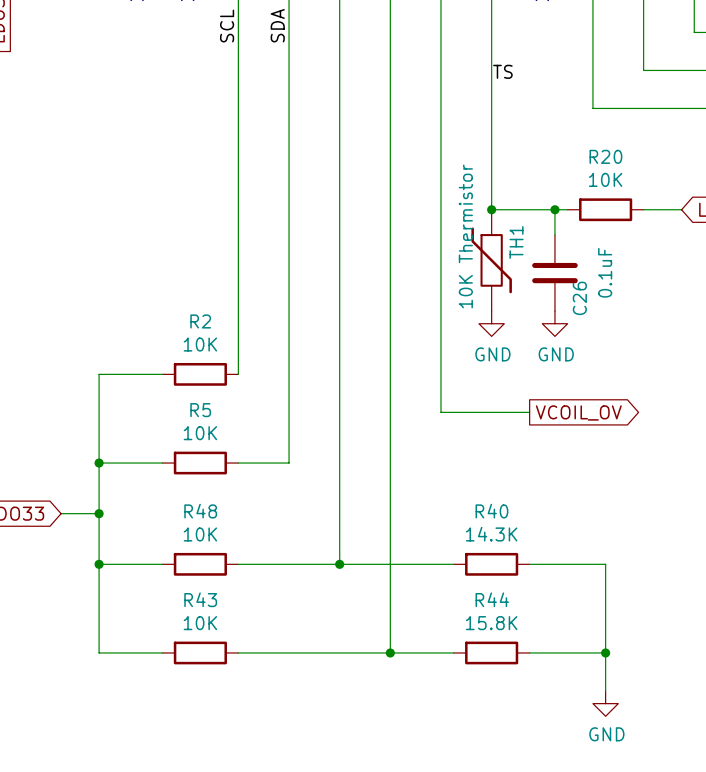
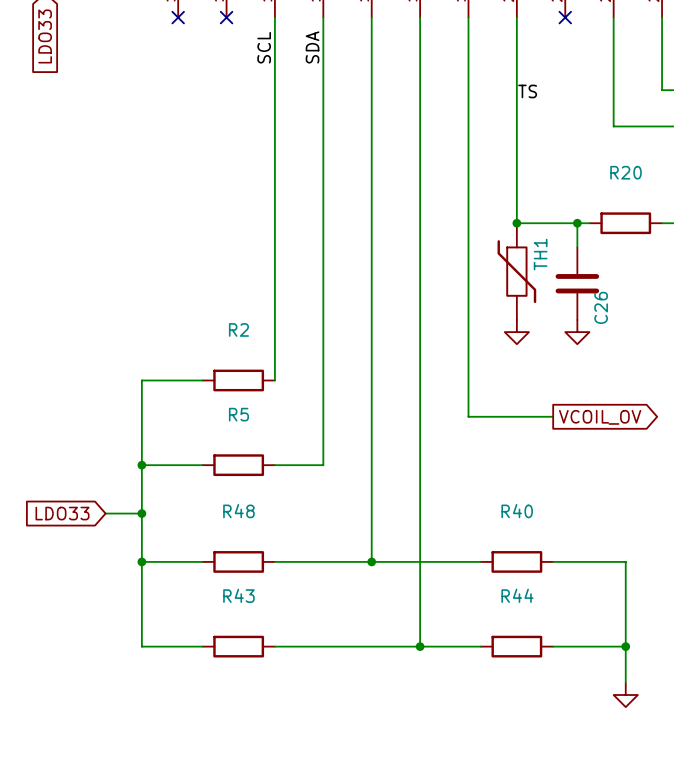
R20 value: 10K (605, 179) -> none
TH1 value: 10K Thermistor (465, 236) -> none
C26 value: 0.1uF (605, 272) -> none
R2 value: 10K (200, 344) -> none
power symbol text: GND (492, 354) -> none
power symbol text: GND (556, 354) -> none
R5 value: 10K (200, 433) -> none
R48 value: 10K (200, 534) -> none
R40 value: 14.3K (491, 534) -> none
R43 value: 10K (200, 623) -> none
R44 value: 15.8K (491, 623) -> none
power symbol text: GND (606, 734) -> none

